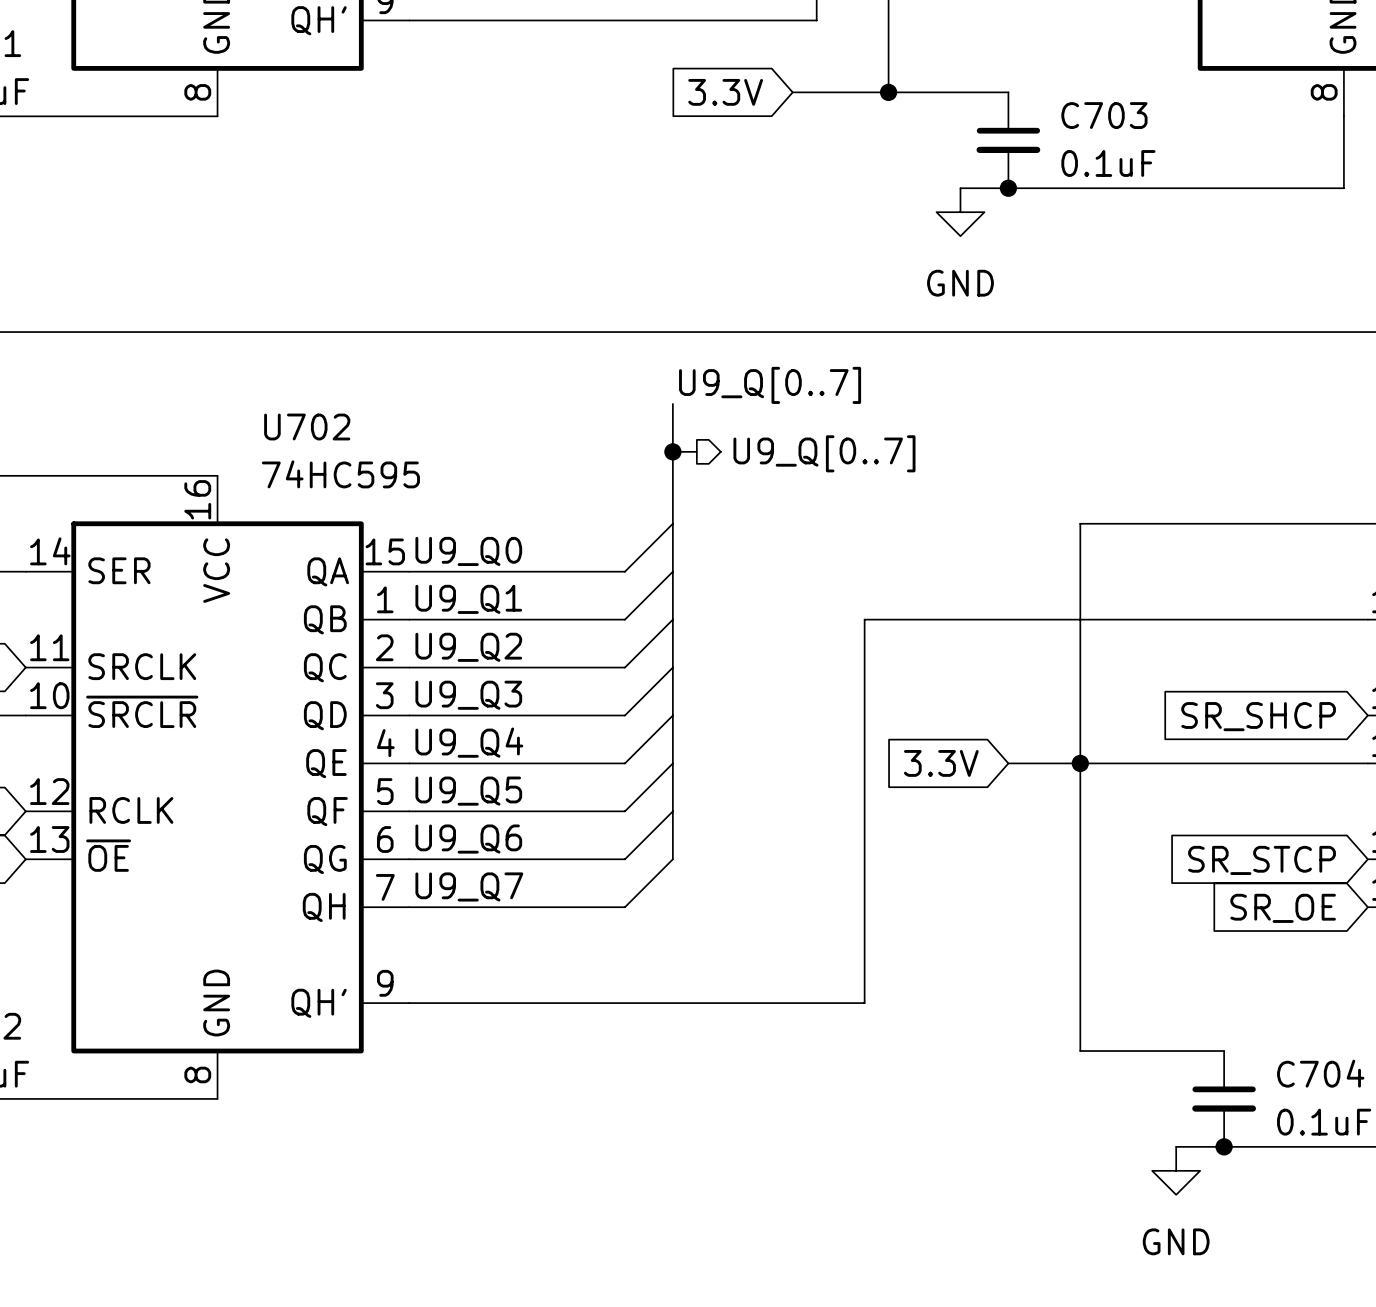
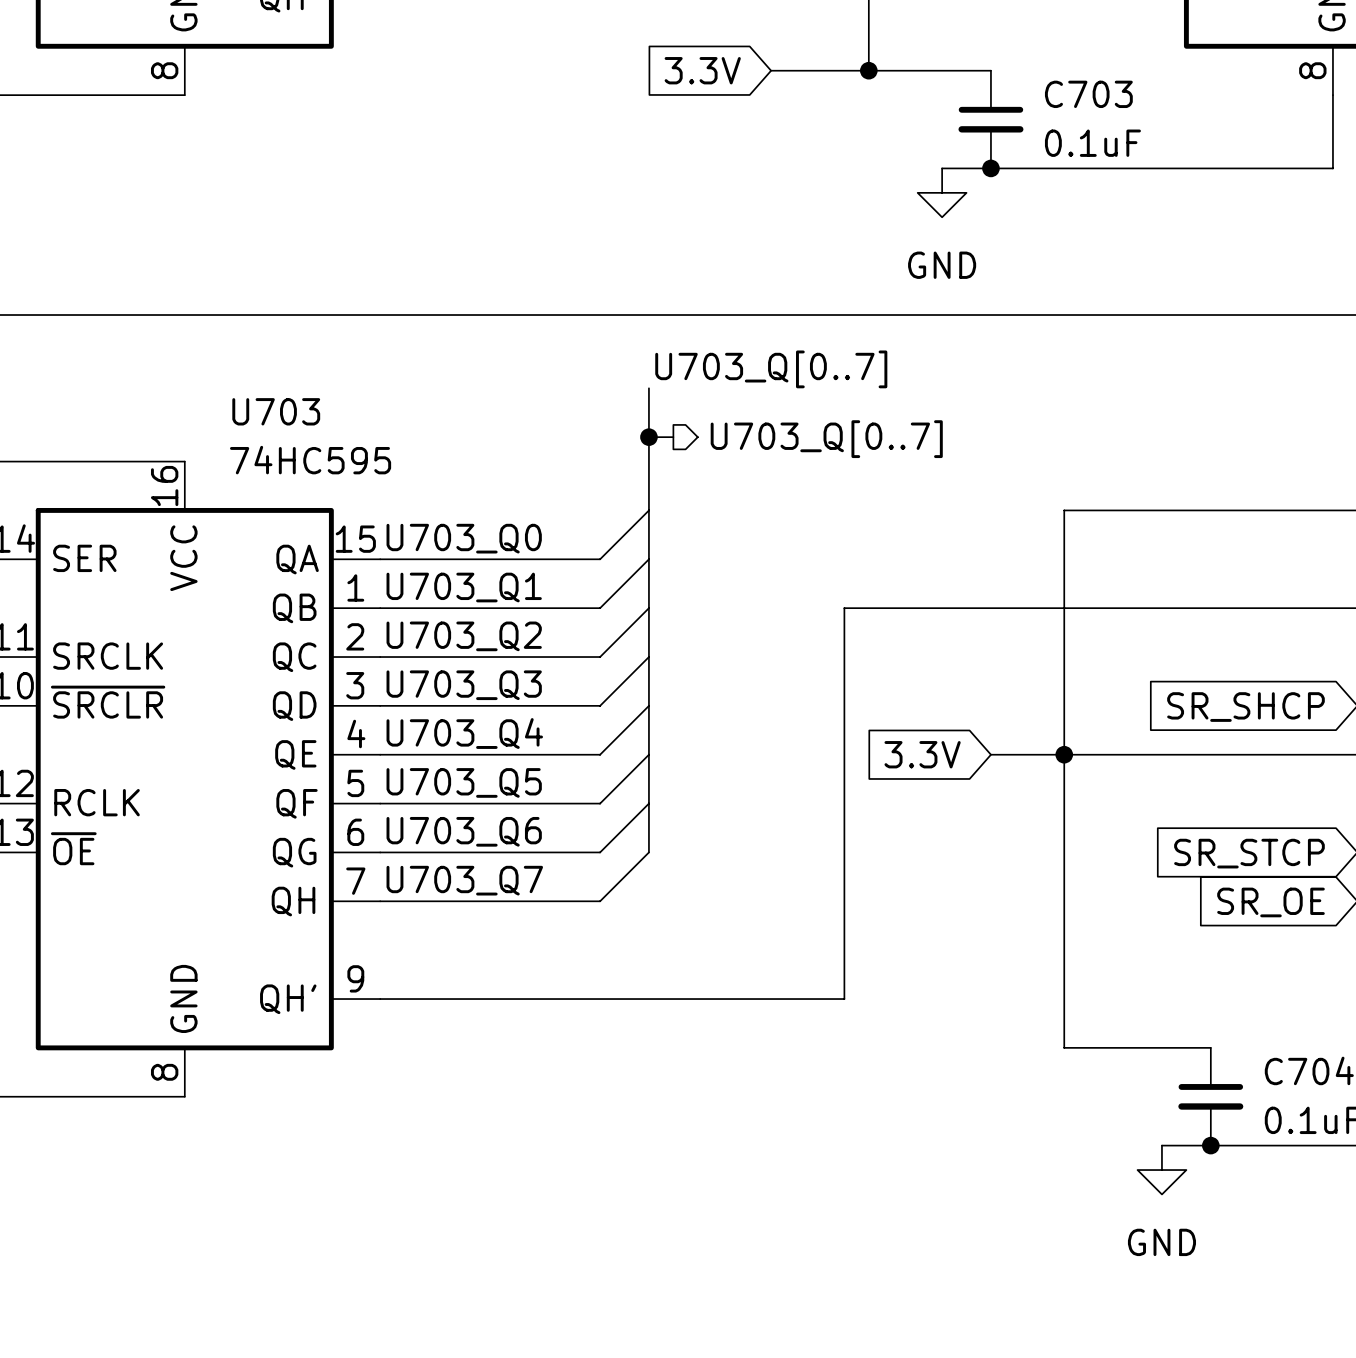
label: U9_Q[0..7] (770, 385) -> U703_Q[0..7] (771, 369)
U702 name: U702 (307, 427) -> U703 (276, 411)
hierarchical label: U9_Q[0..7] (824, 453) -> U703_Q[0..7] (826, 439)
label: U9_Q0 (468, 551) -> U703_Q0 (464, 538)
label: U9_Q1 (468, 599) -> U703_Q1 (464, 587)
label: U9_Q2 (468, 647) -> U703_Q2 (464, 636)
label: U9_Q3 (468, 695) -> U703_Q3 (464, 685)
label: U9_Q4 (469, 742) -> U703_Q4 (464, 733)
label: U9_Q5 (468, 791) -> U703_Q5 (464, 782)
label: U9_Q6 (468, 839) -> U703_Q6 (464, 831)
label: U9_Q7 (469, 886) -> U703_Q7 (464, 880)

